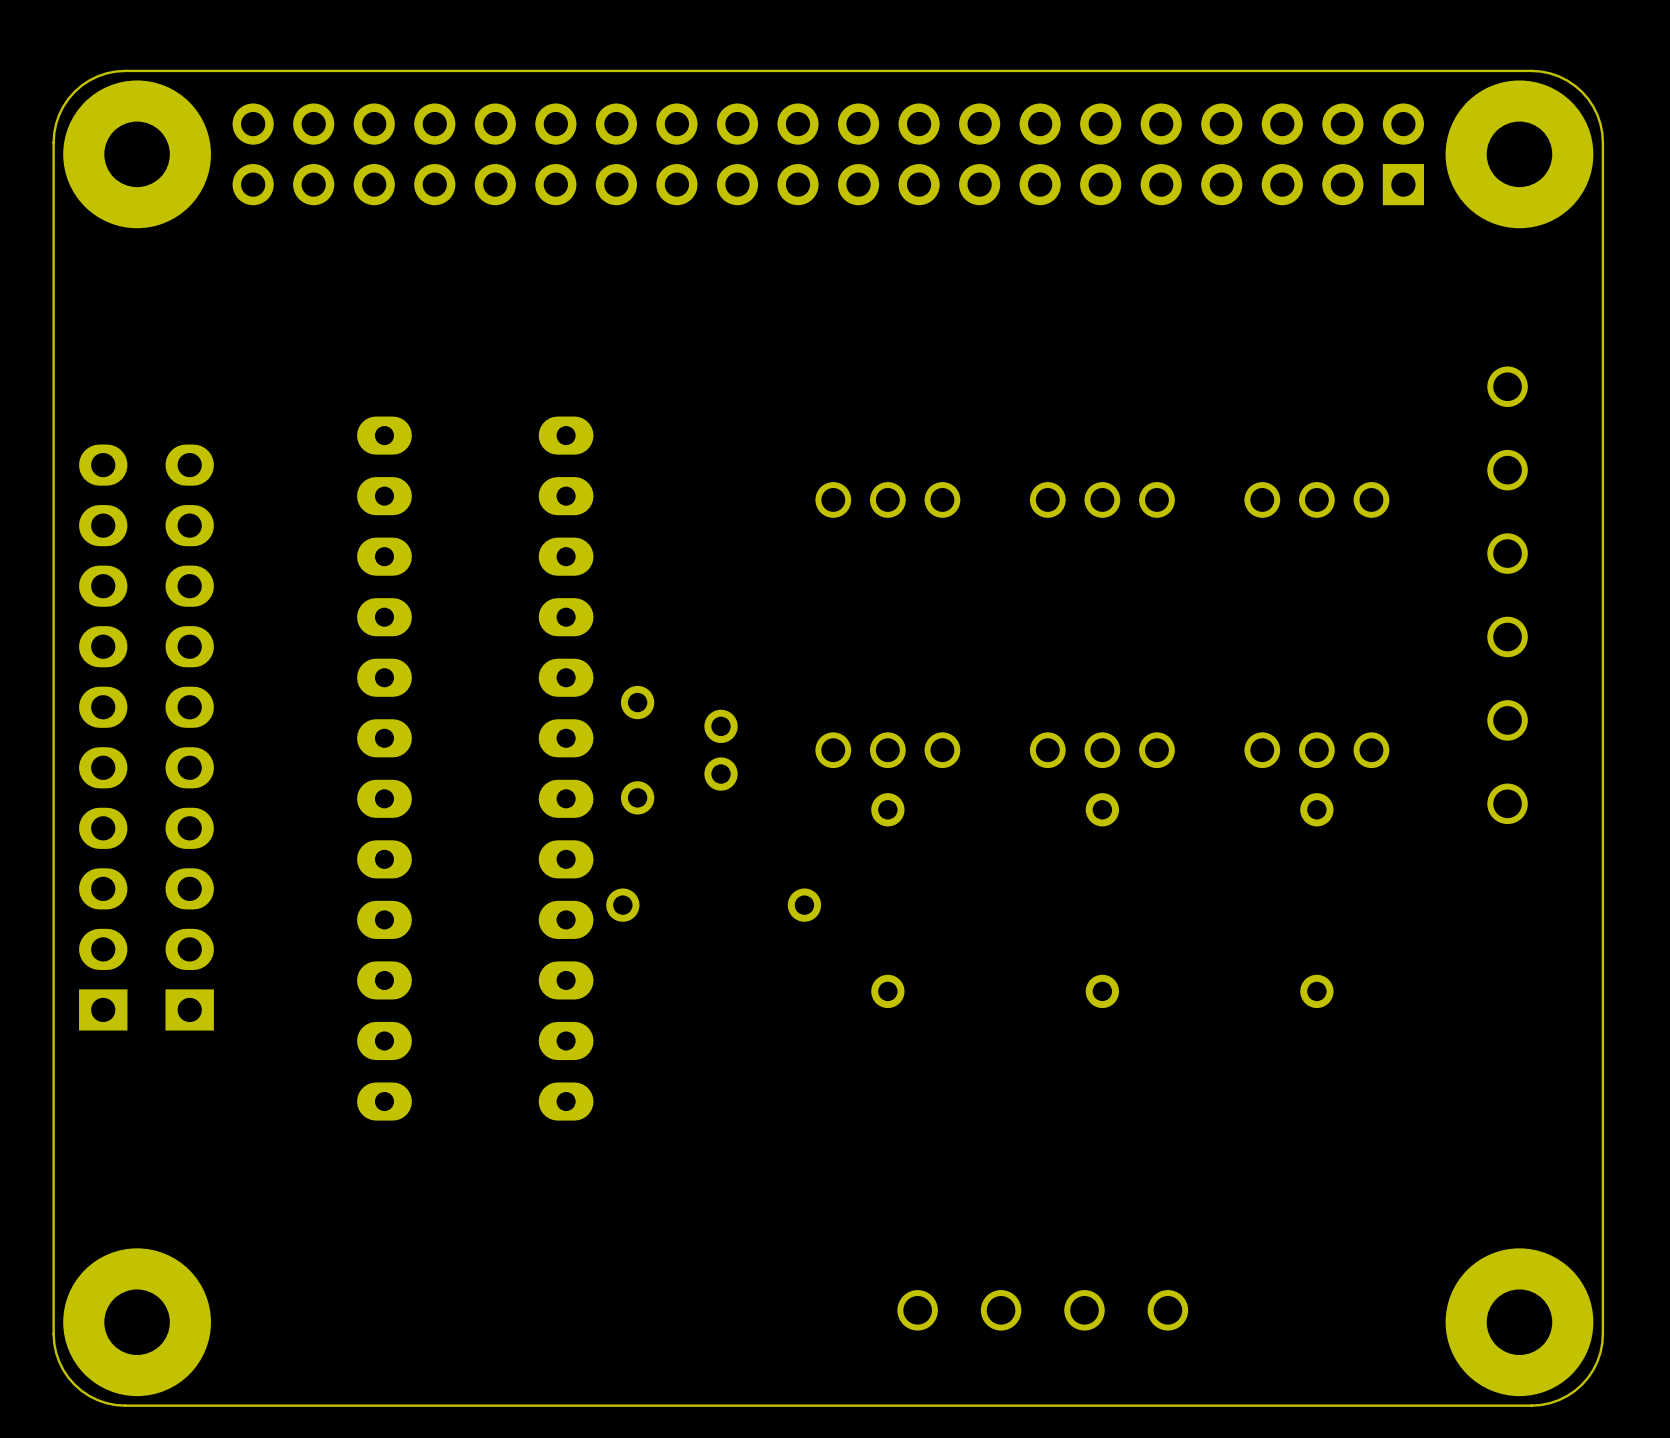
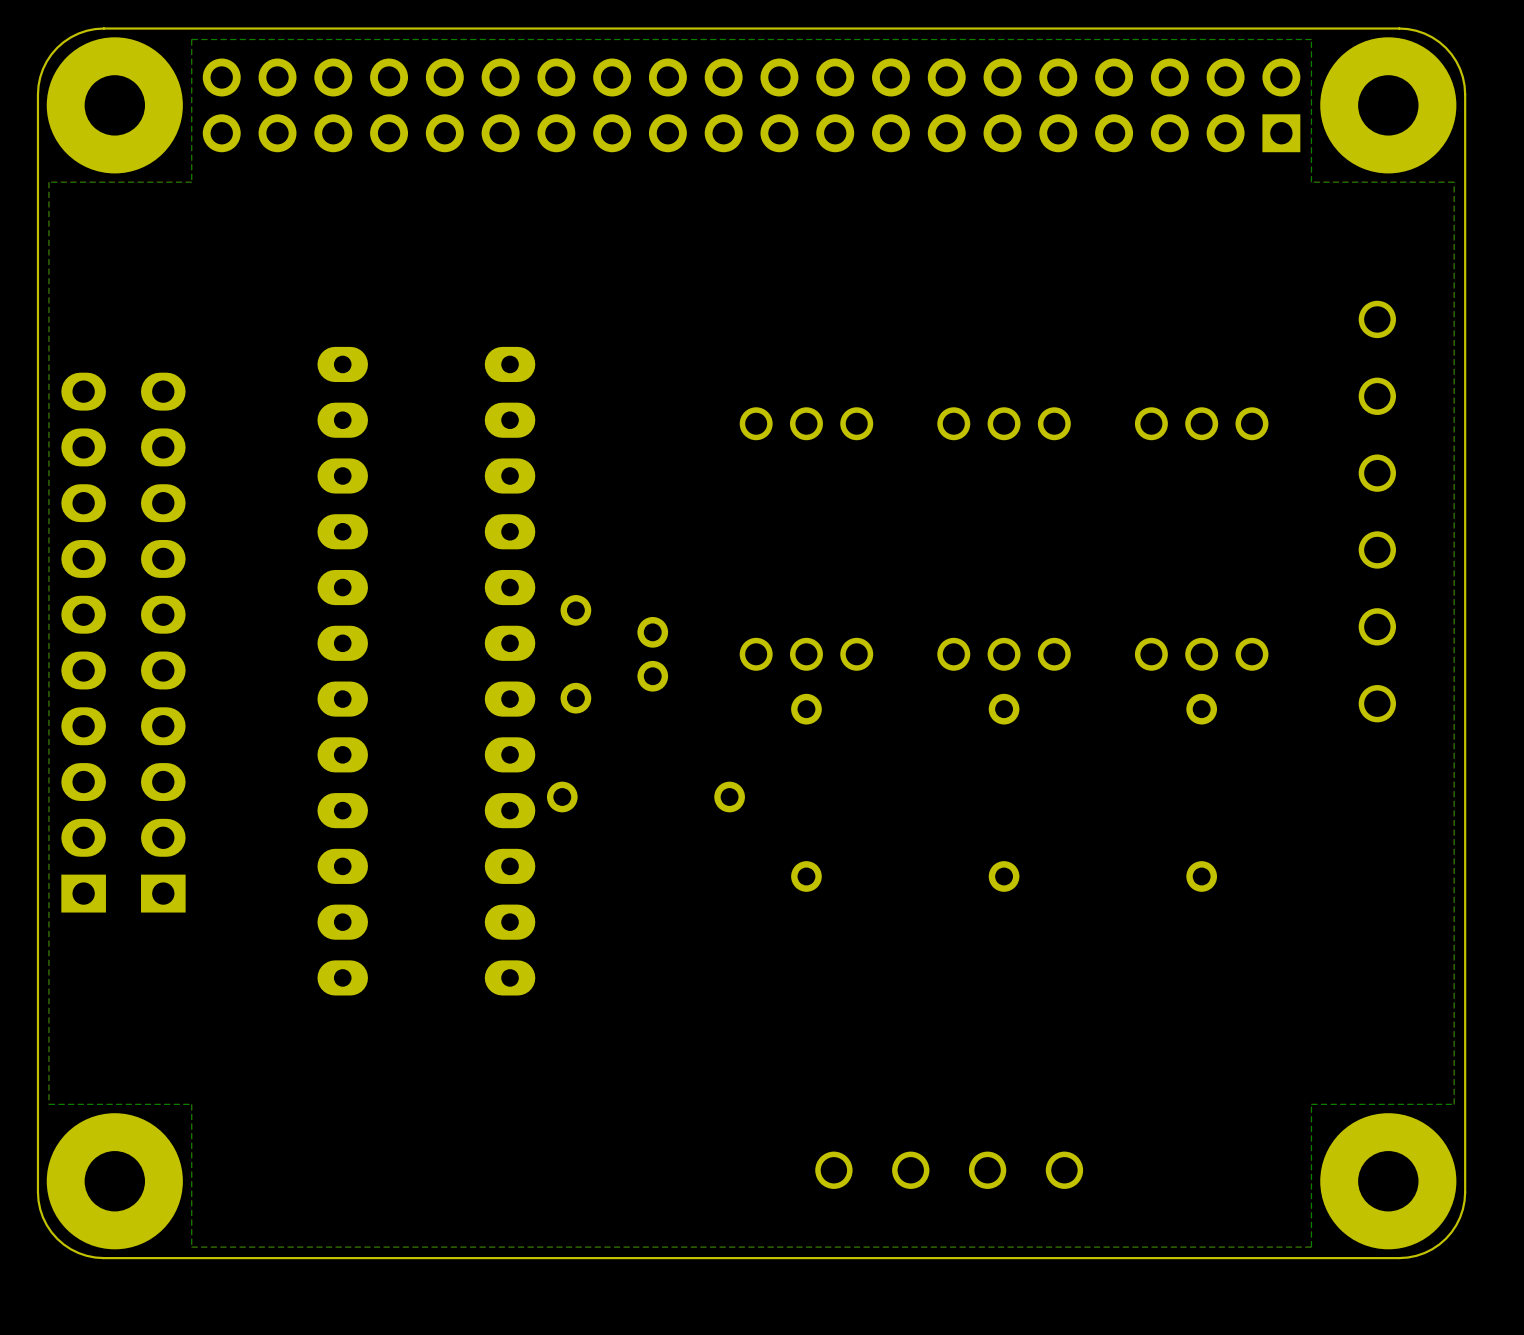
bottom zone outline: none -> (1311, 39) (1311, 182) (1454, 182) (1454, 1104) (1311, 1104) (1311, 1247) (191, 1247) (191, 1104) (48, 1104) (48, 182) (191, 182) (191, 39) (1311, 39)

